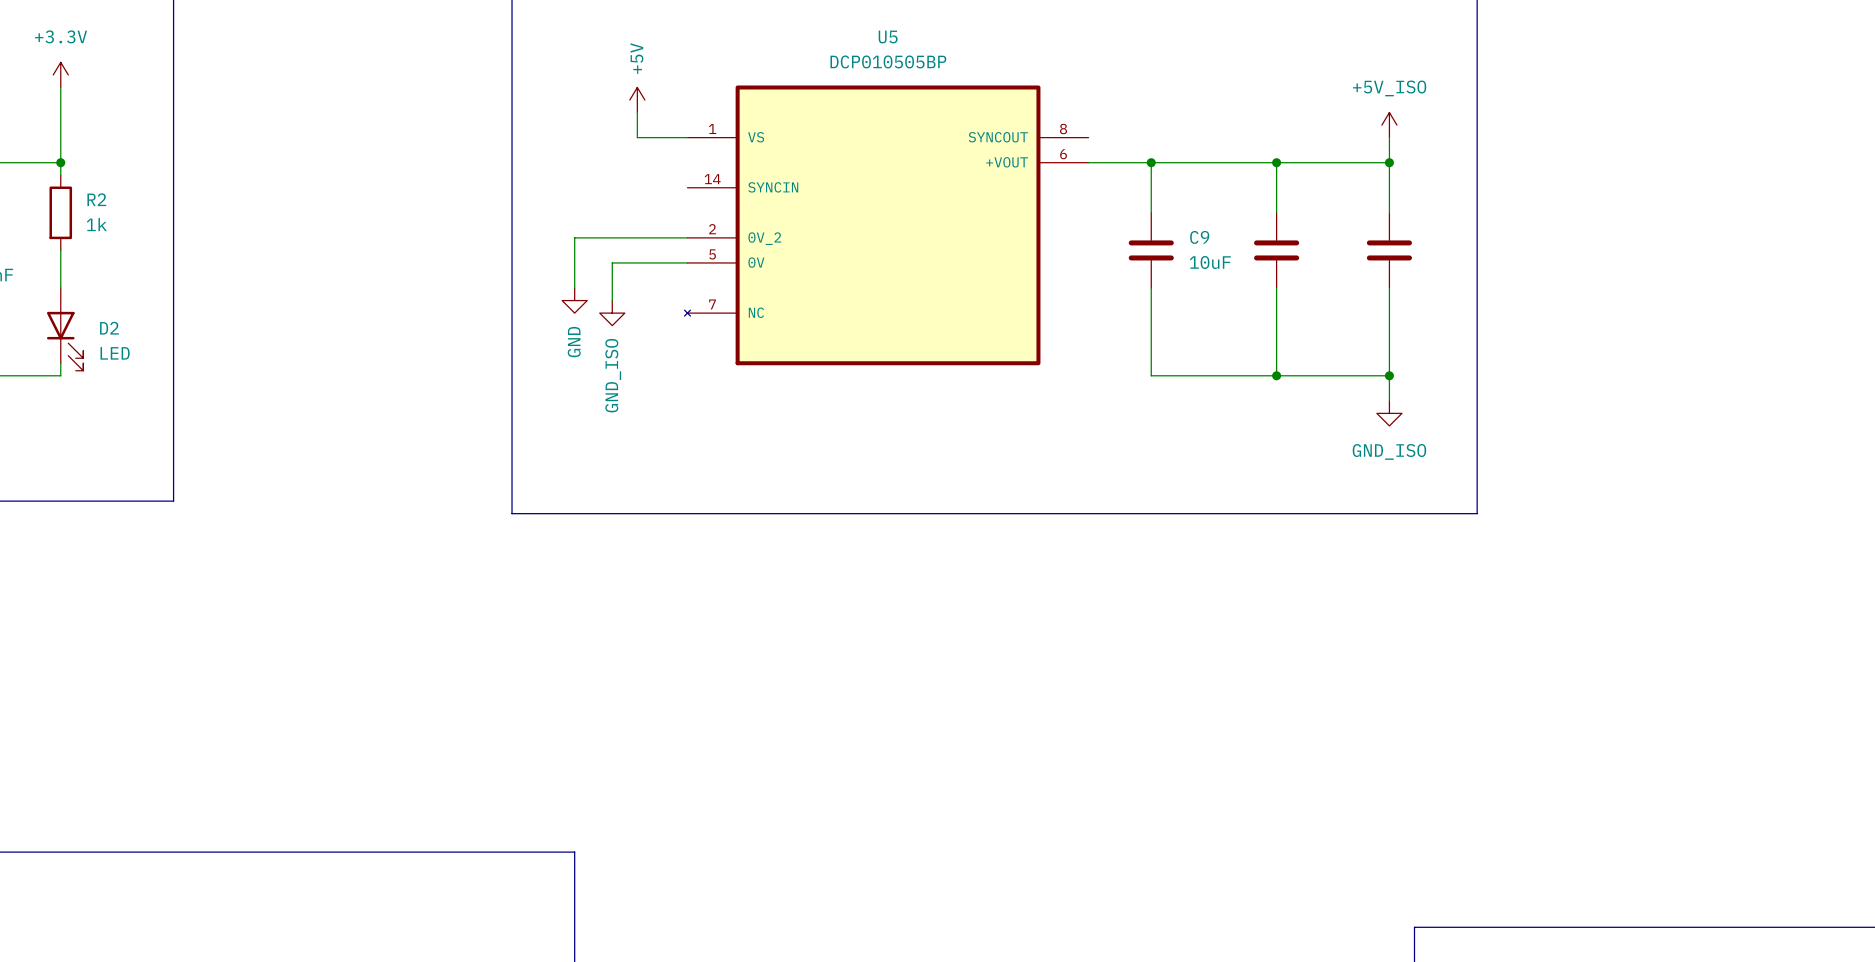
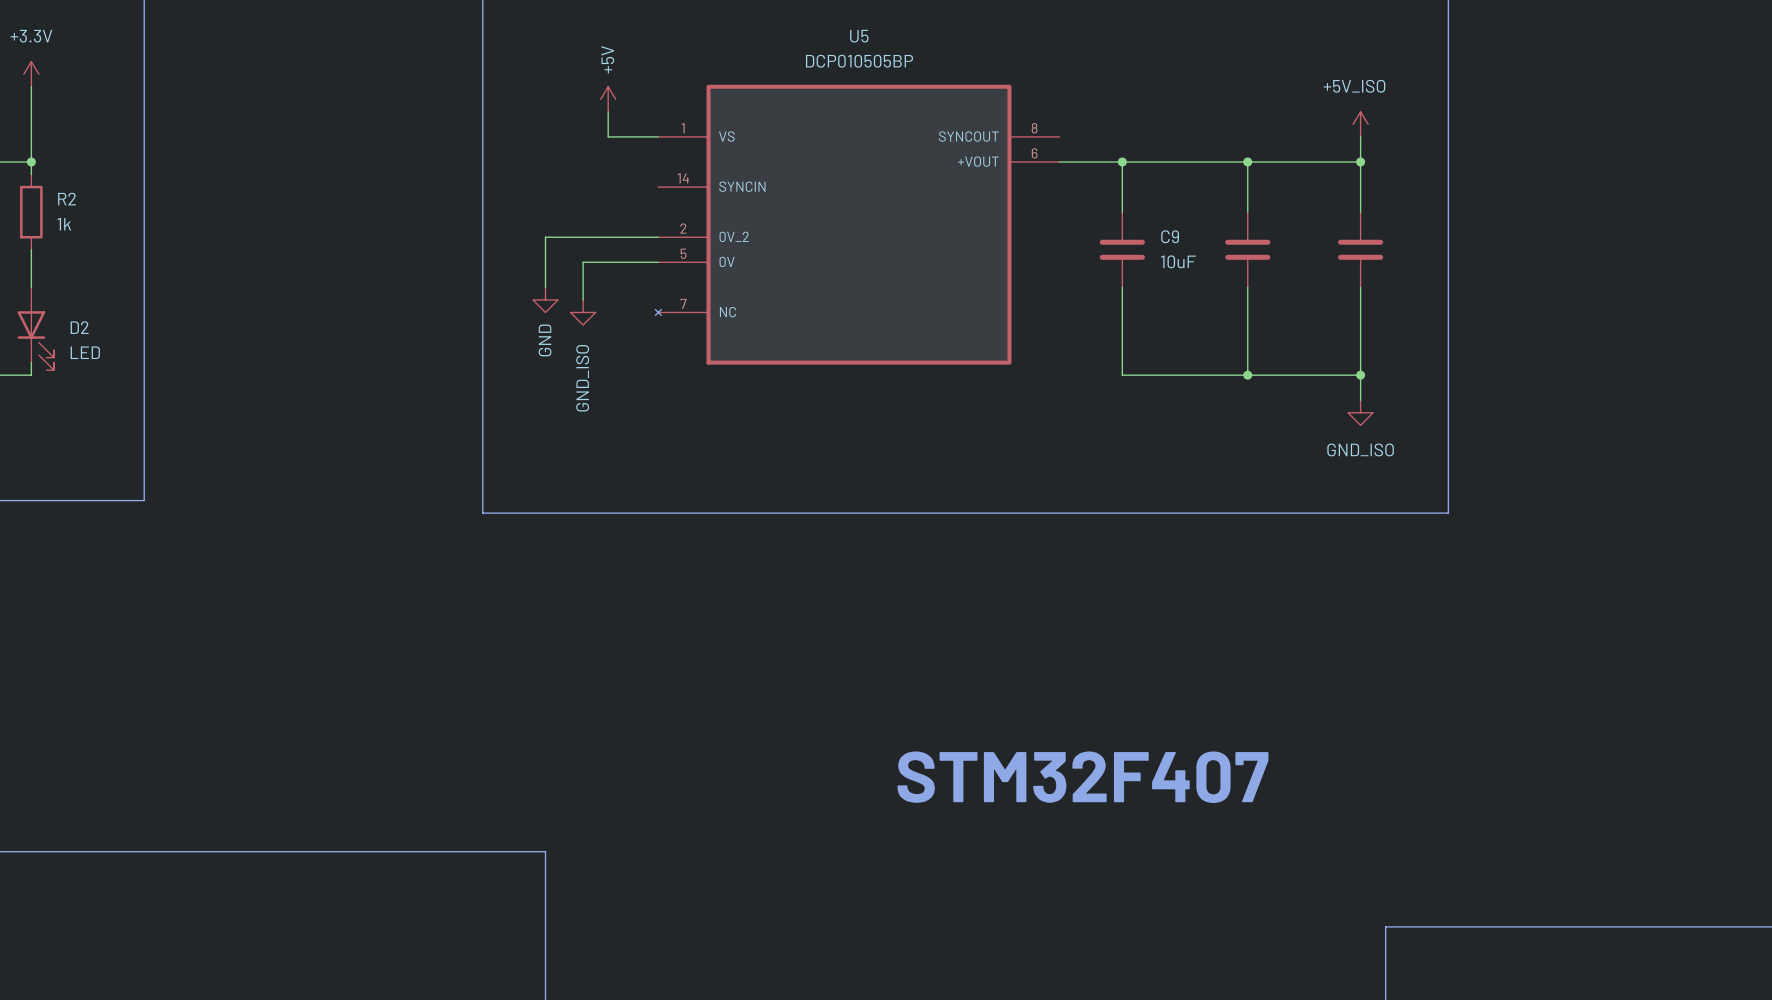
text: none -> STM32F407 (1083, 777)

